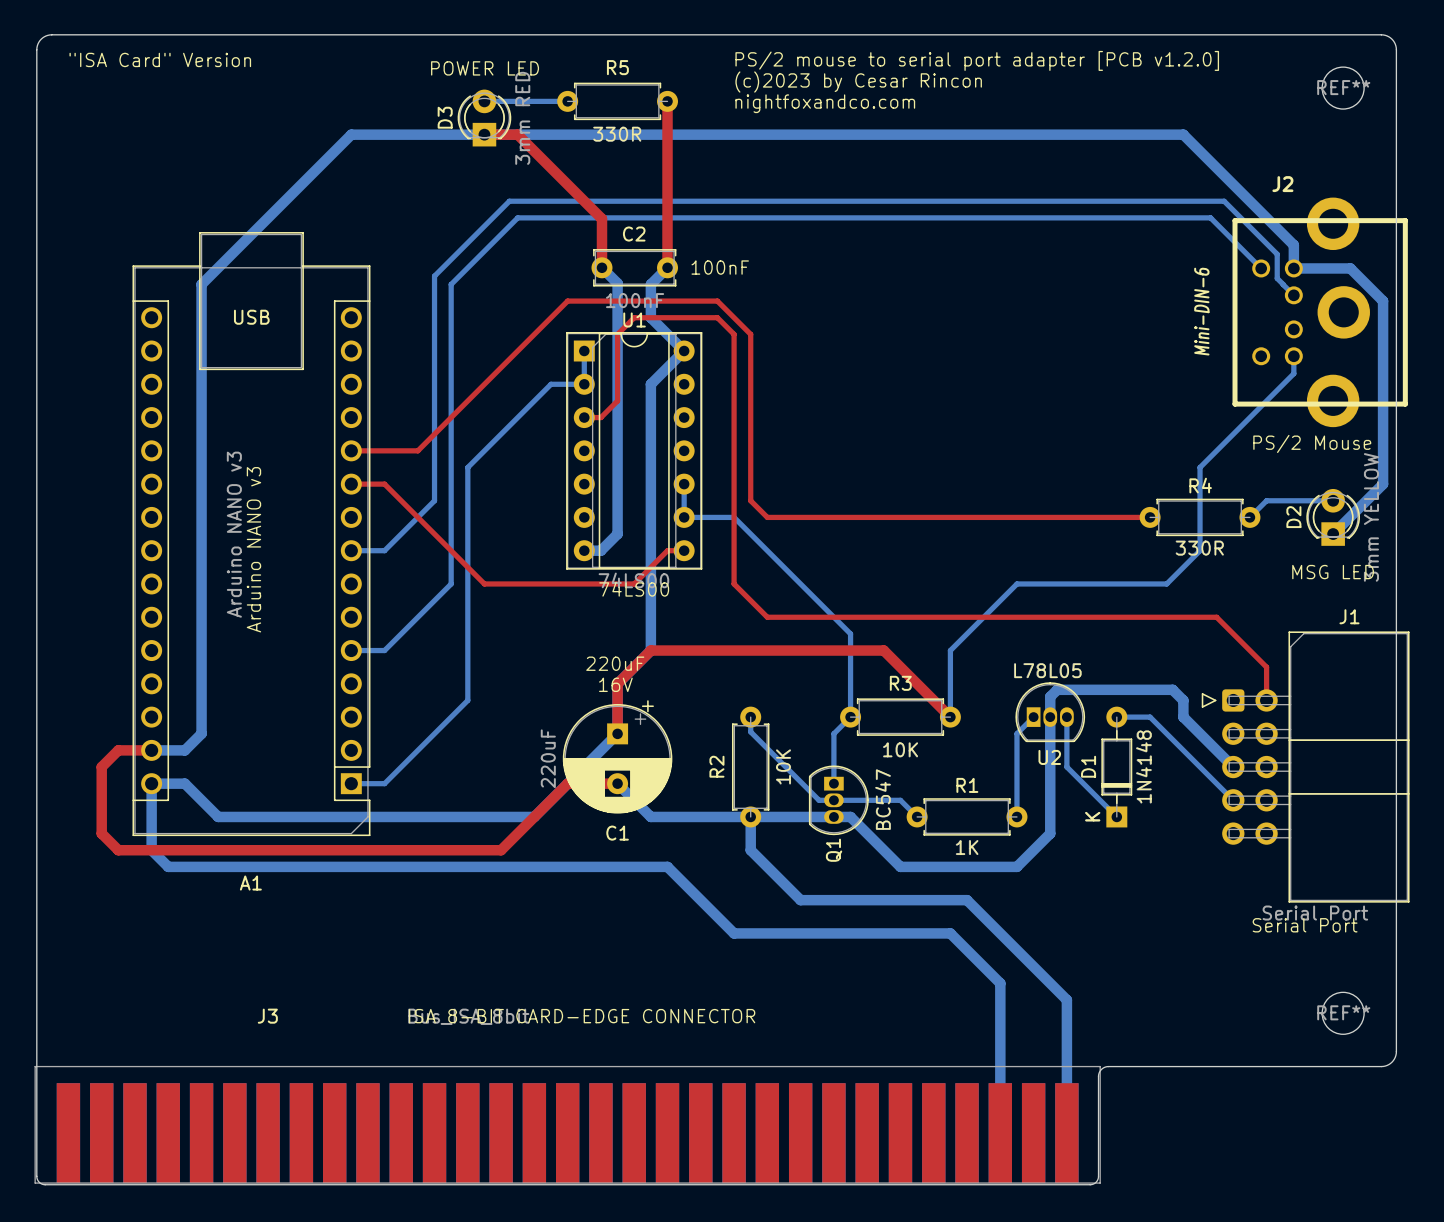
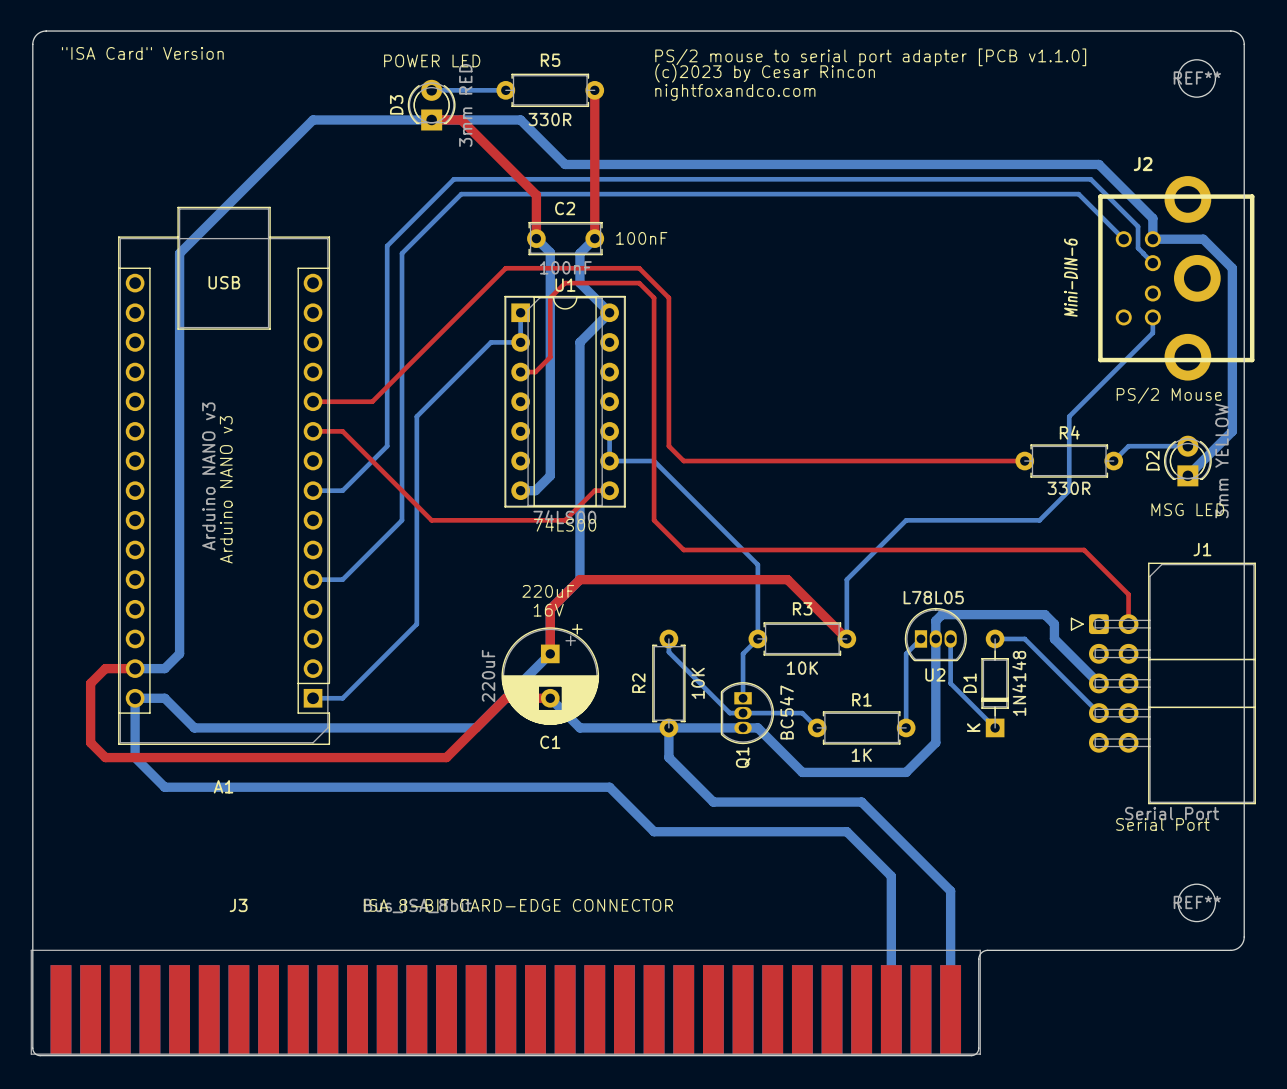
text: PS/2 mouse to serial port adapter [PCB v1.2.0] (977, 60) -> PS/2 mouse to serial port adapter [PCB v1.1.0] (870, 57)
bottom track: (584, 134) (1183, 134) (1233, 184) -> (520, 119) (565, 164) (1098, 164)
bottom track: (168, 866) (667, 866) (684, 883) -> (149, 772) (164, 787) (609, 787)

